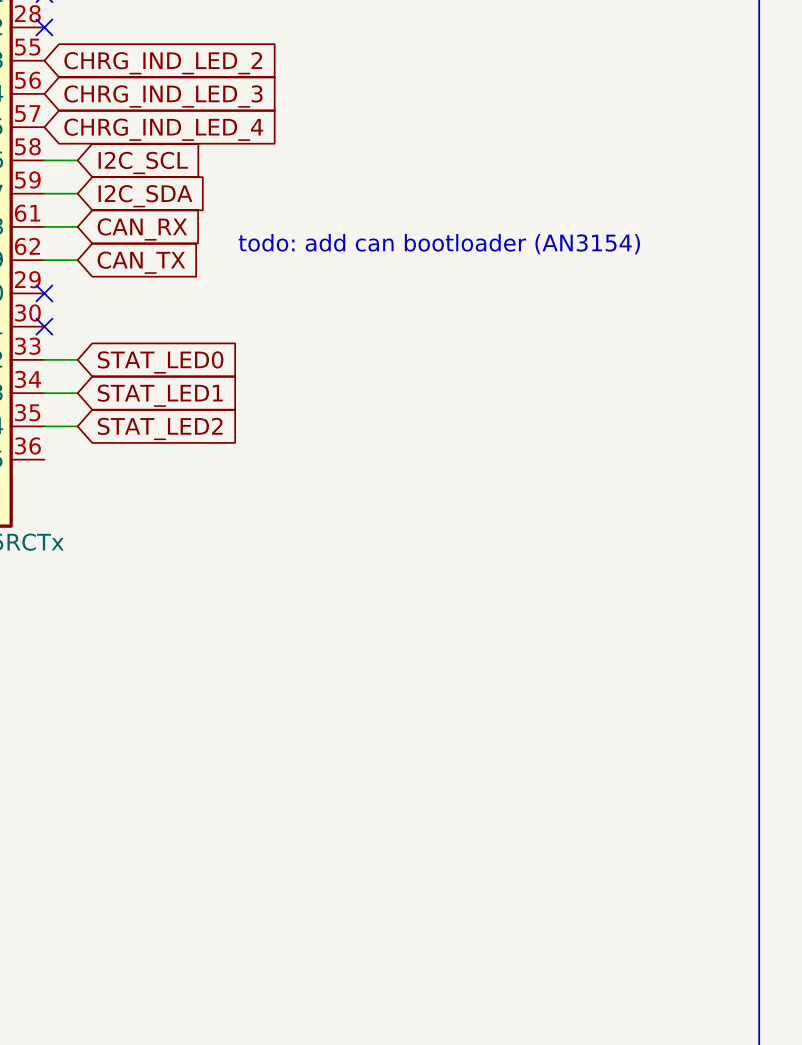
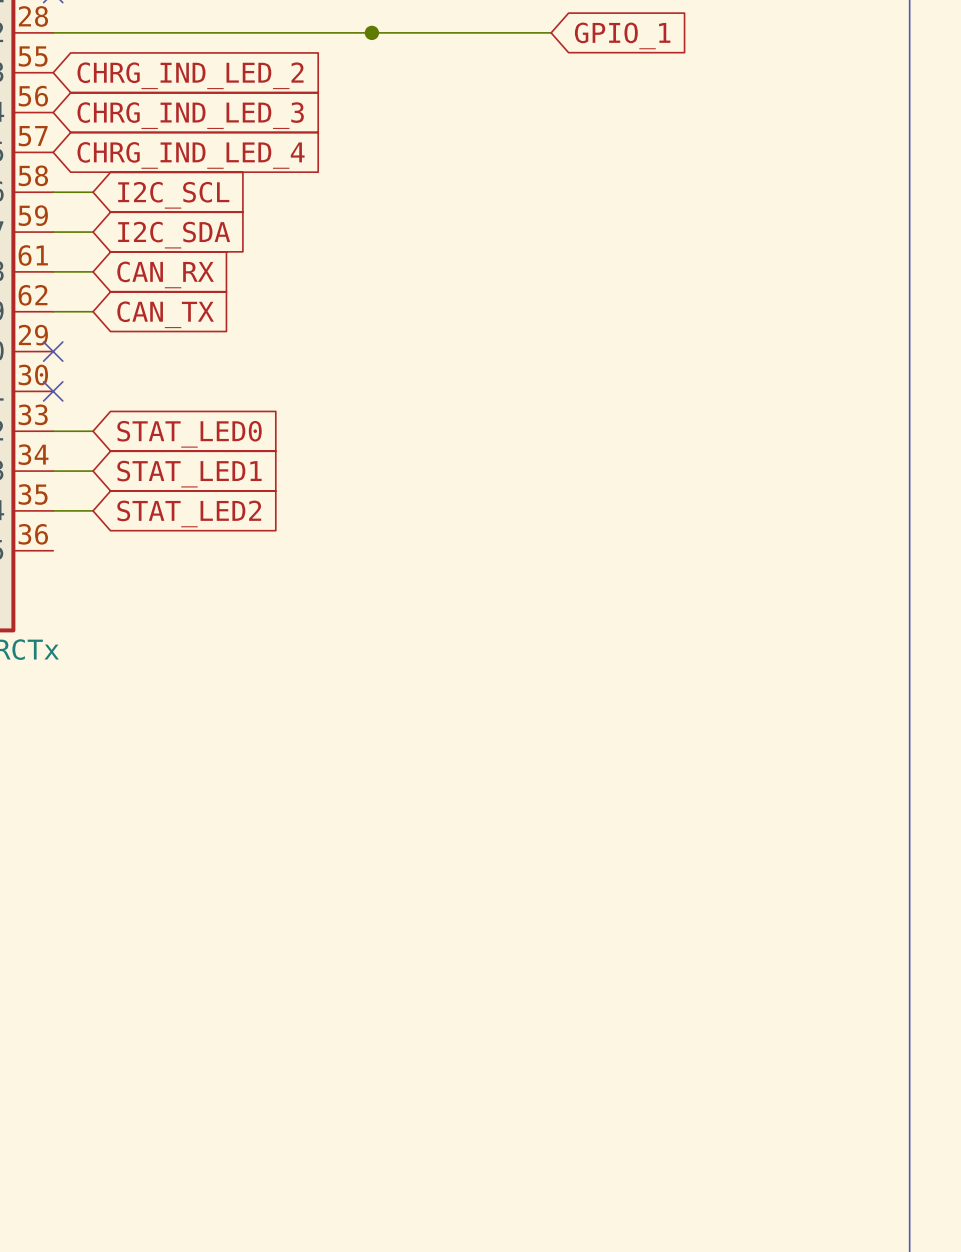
wire: none -> (53, 32) (551, 32)
no-connect mark: (44, 27) -> none
junction: none -> (371, 32)
global label: none -> GPIO_1 (622, 35)
text: todo: add can bootloader (AN3154) (439, 244) -> none

